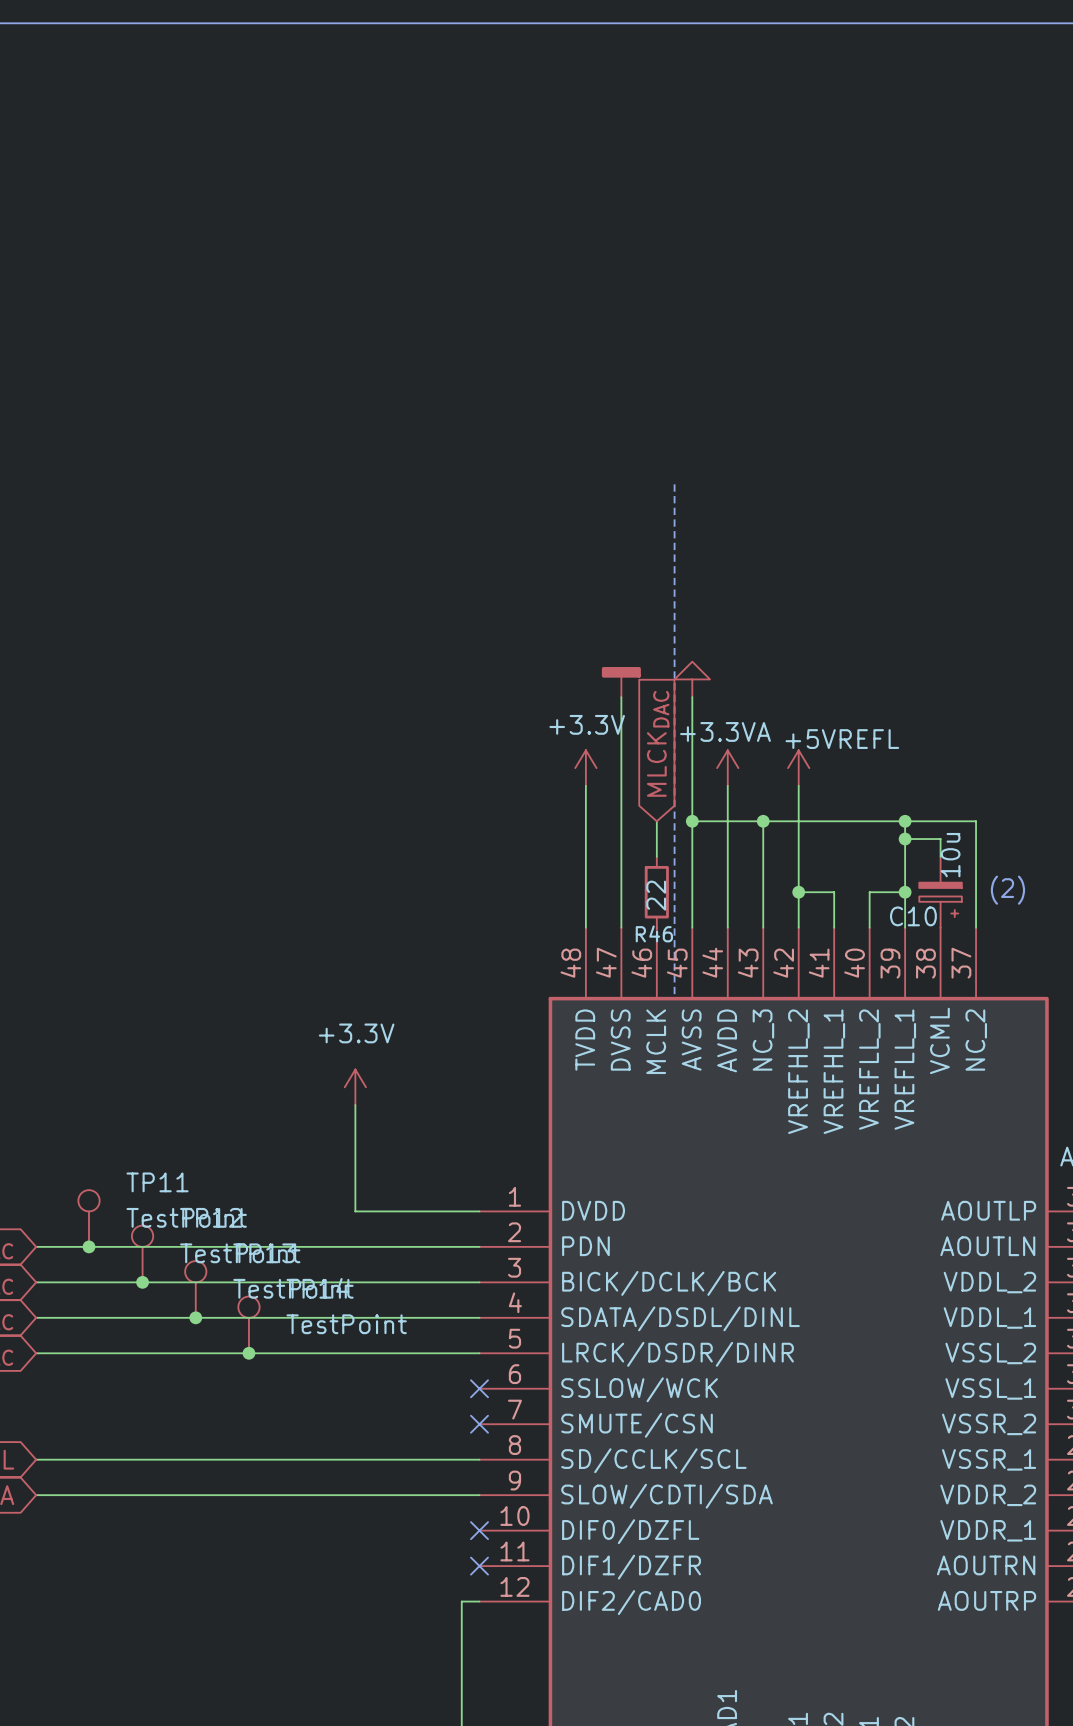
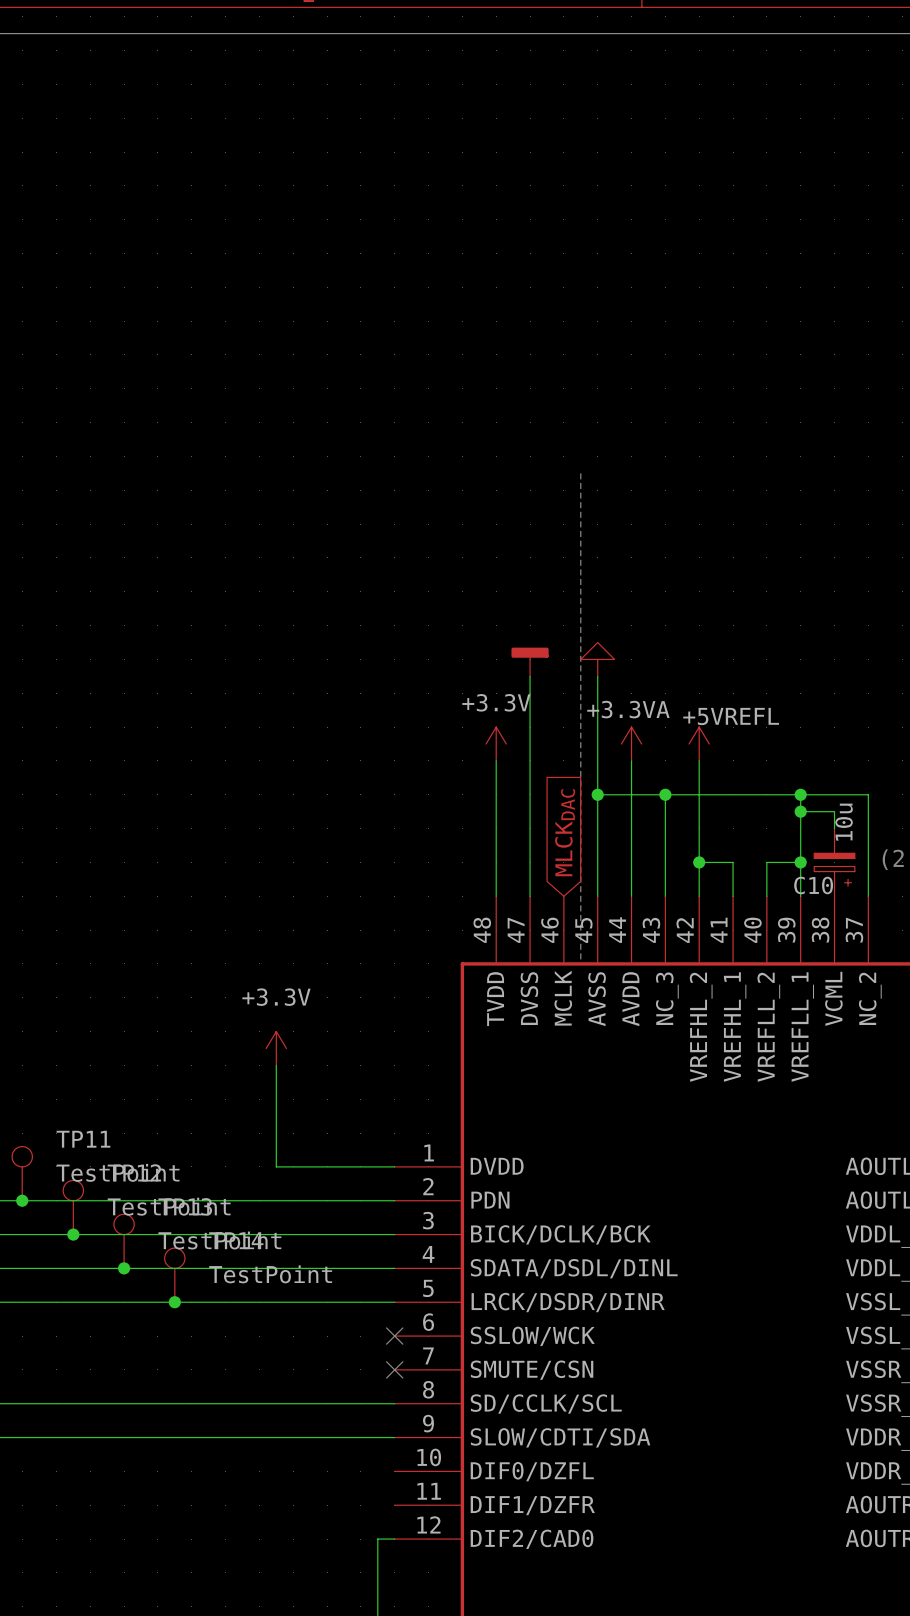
global label position: MLCKDAC (658, 743) -> MLCKDAC (565, 832)
wire: (656, 821) (656, 856) -> none
R46: 22 (656, 892) -> none
no-connect mark: (479, 1530) -> none
no-connect mark: (479, 1566) -> none

